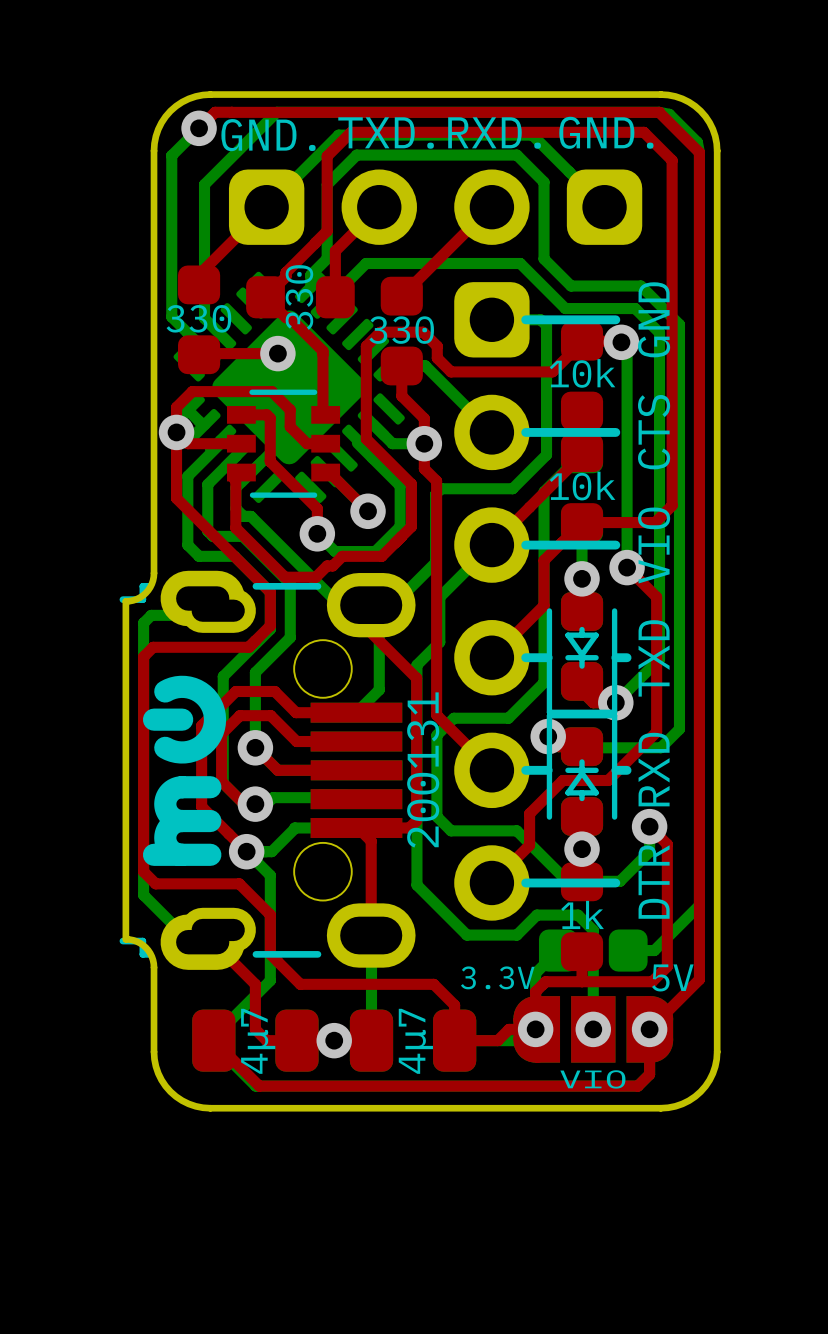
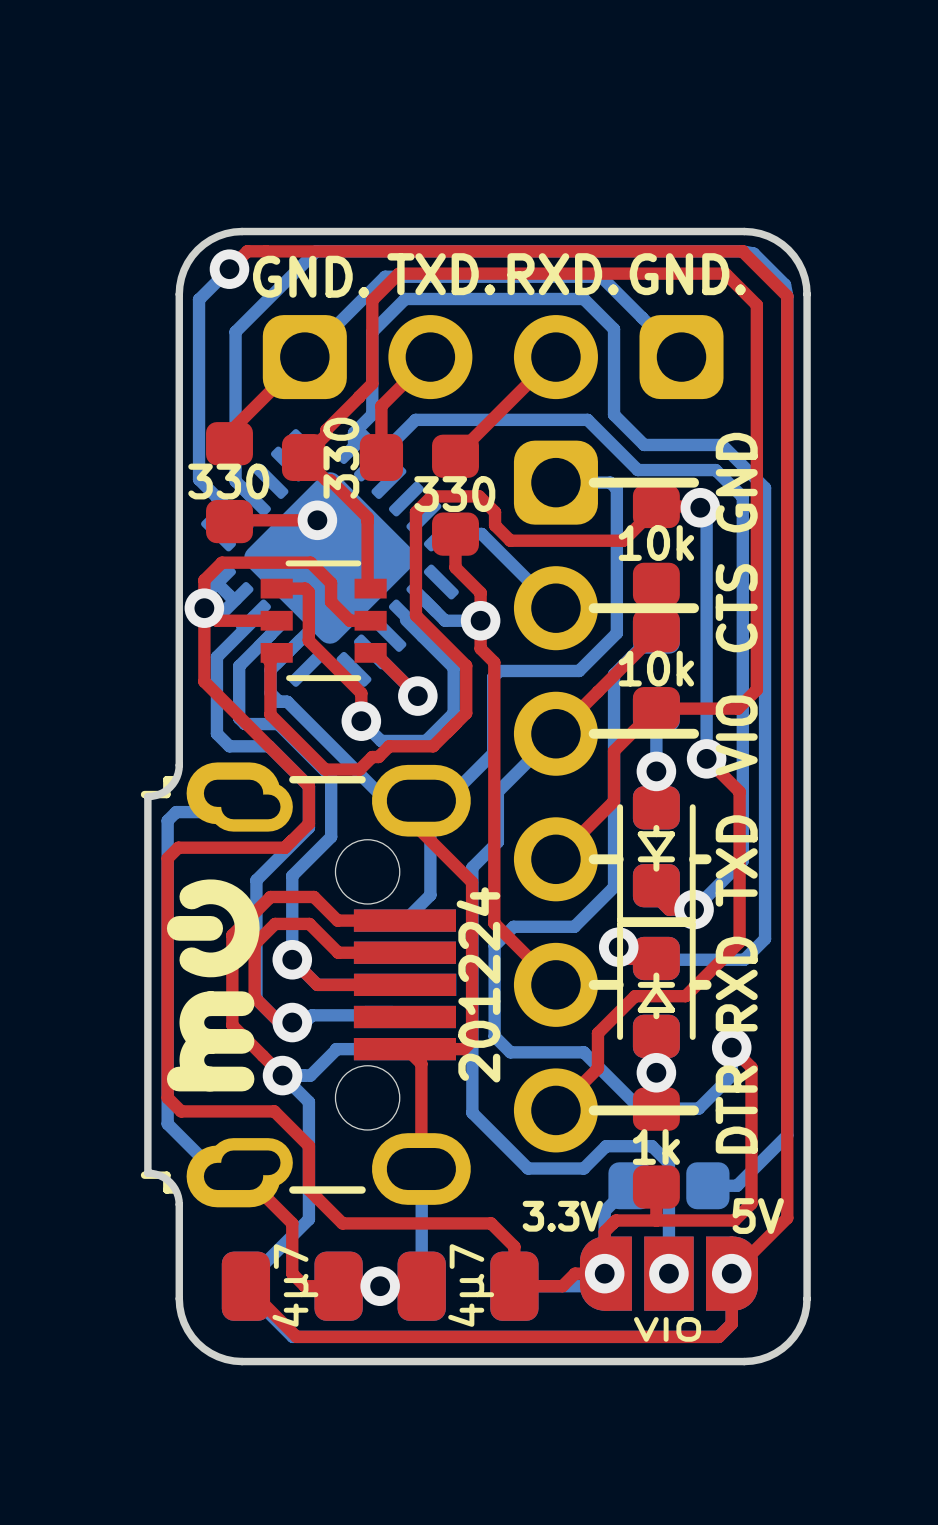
text: 200131 (423, 769) -> 201224 (478, 984)

